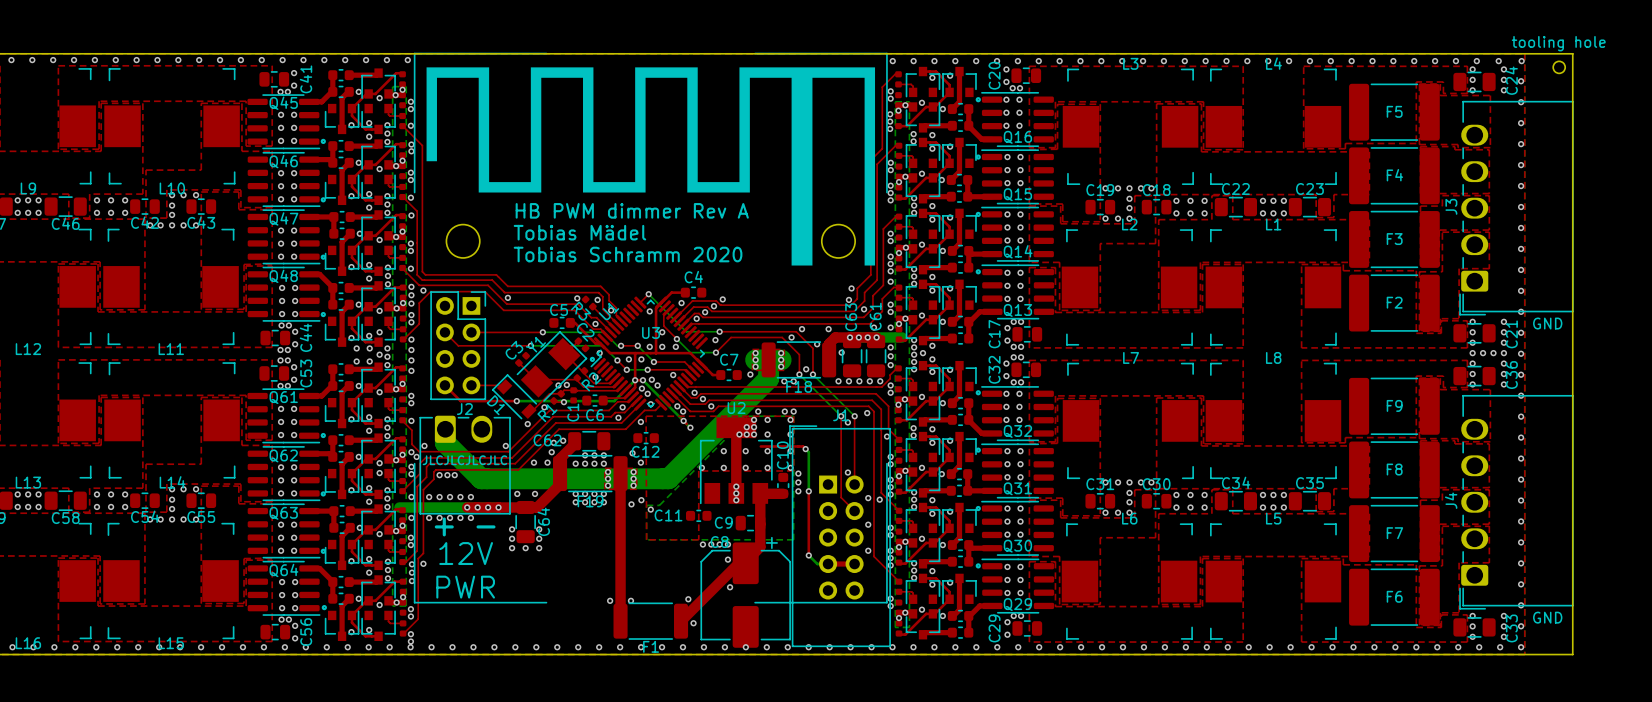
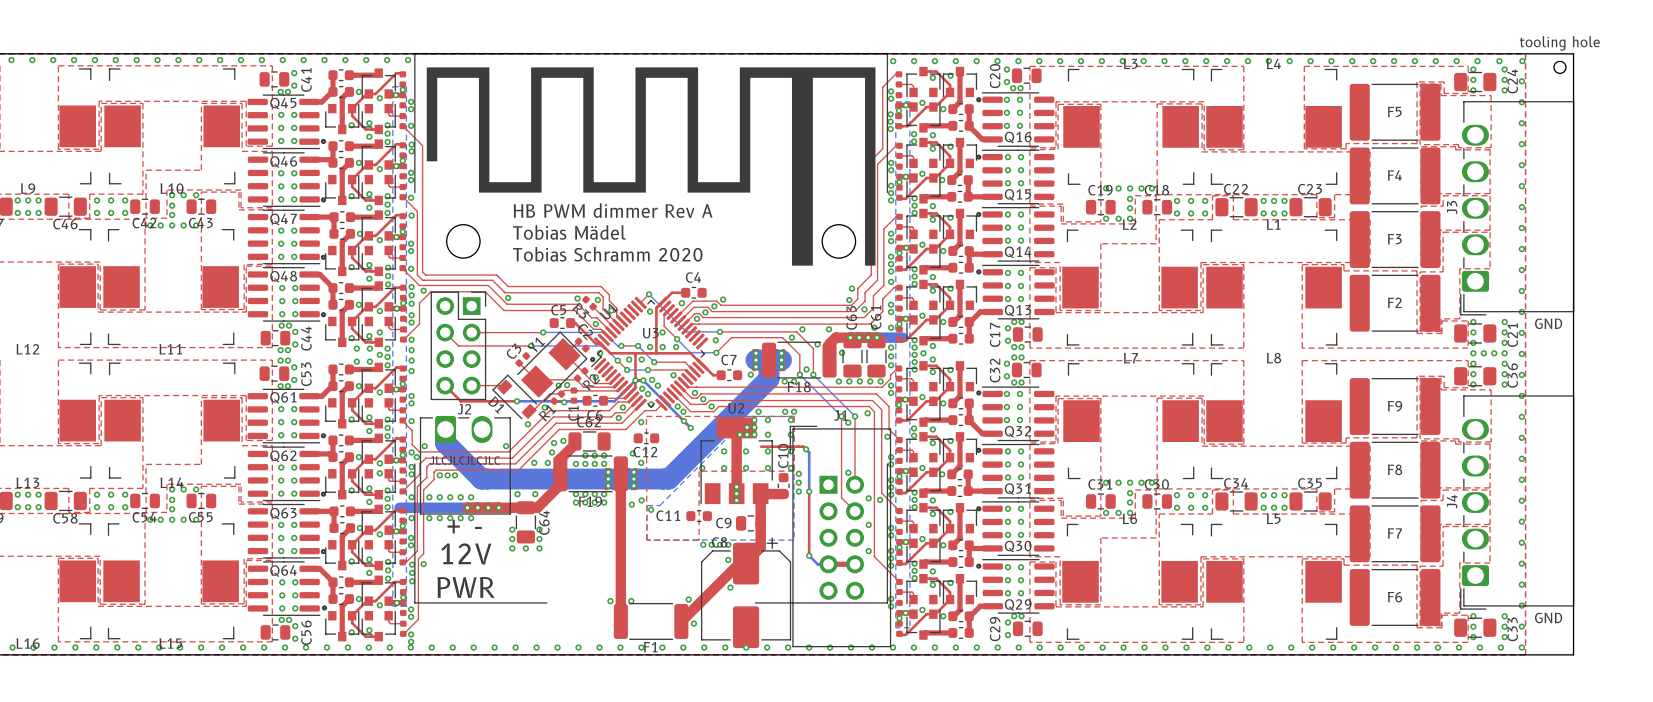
C62 name position: C62 (547, 440) -> C62 (589, 422)

